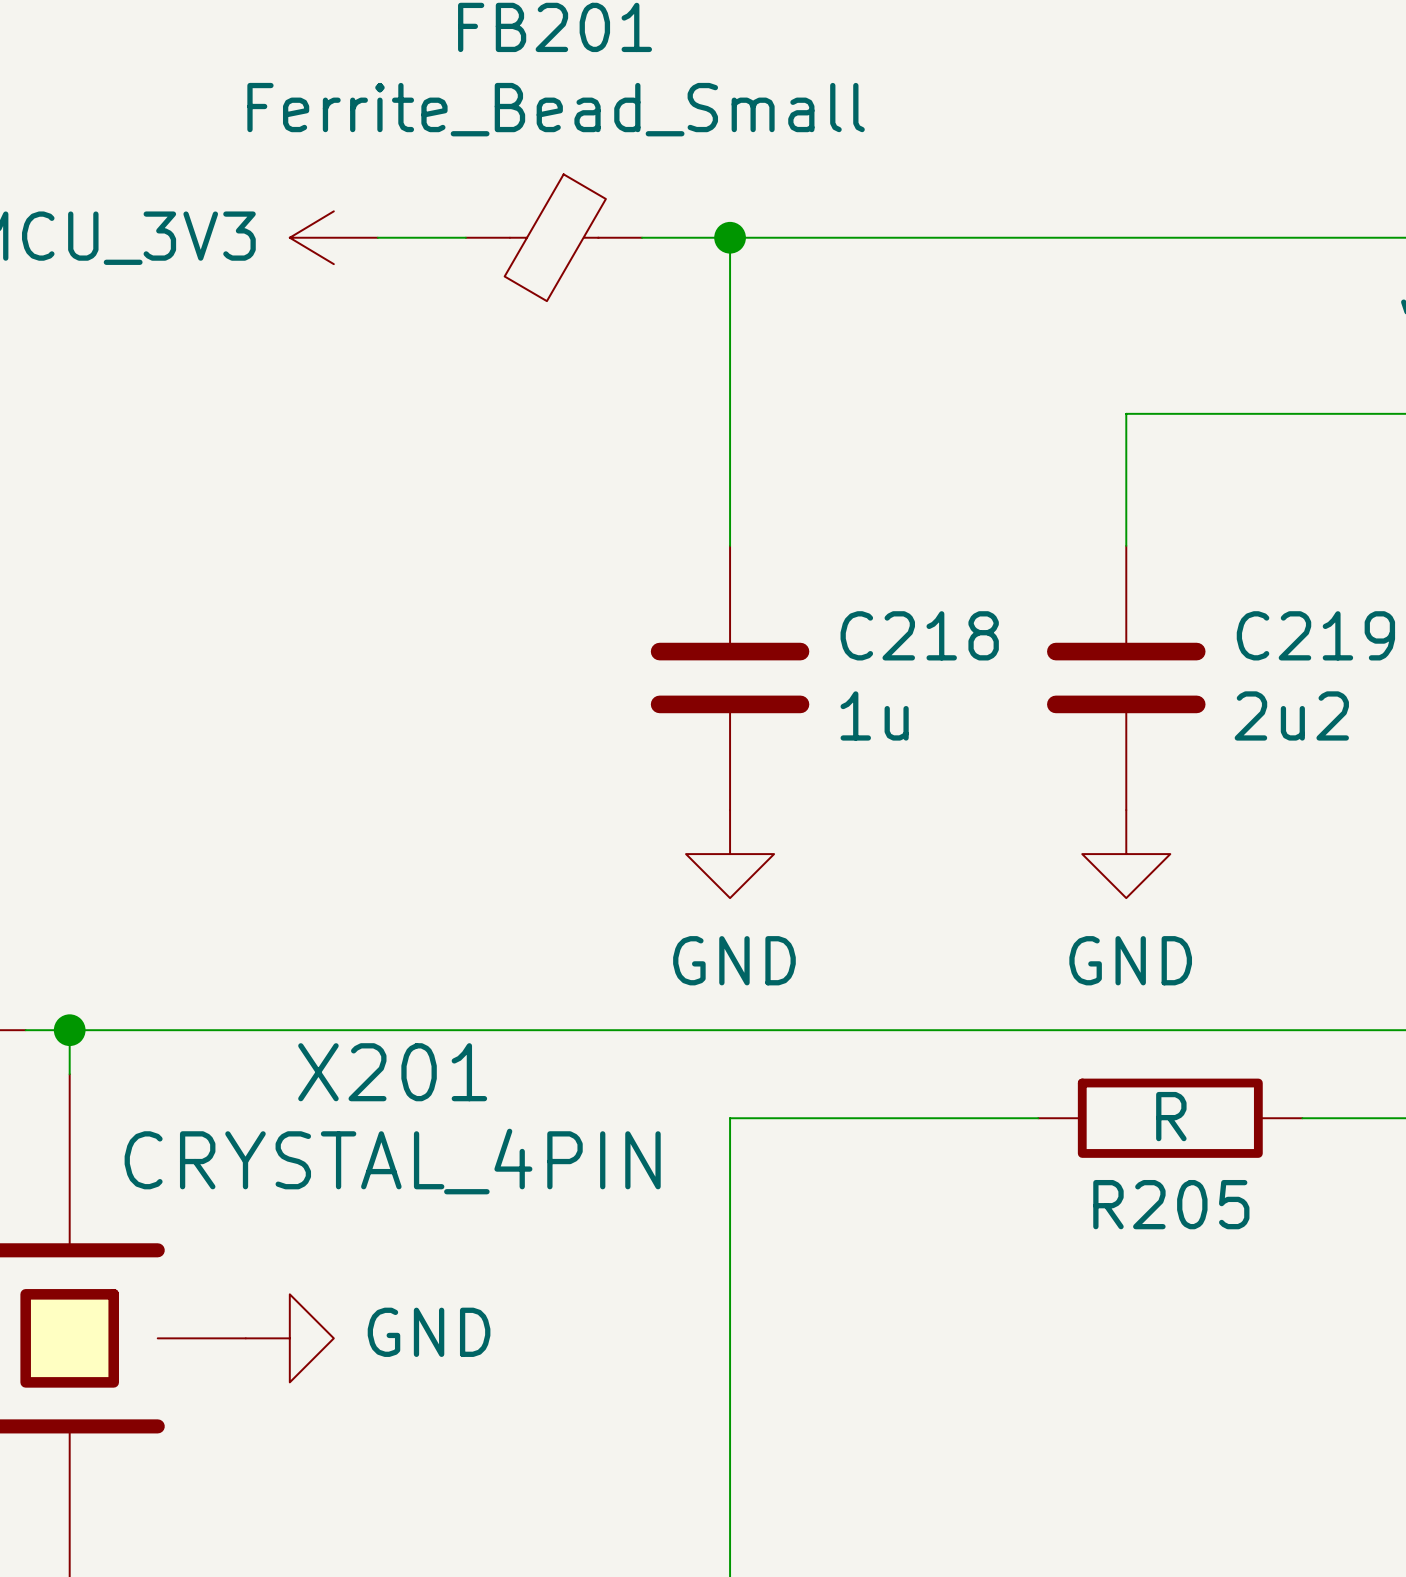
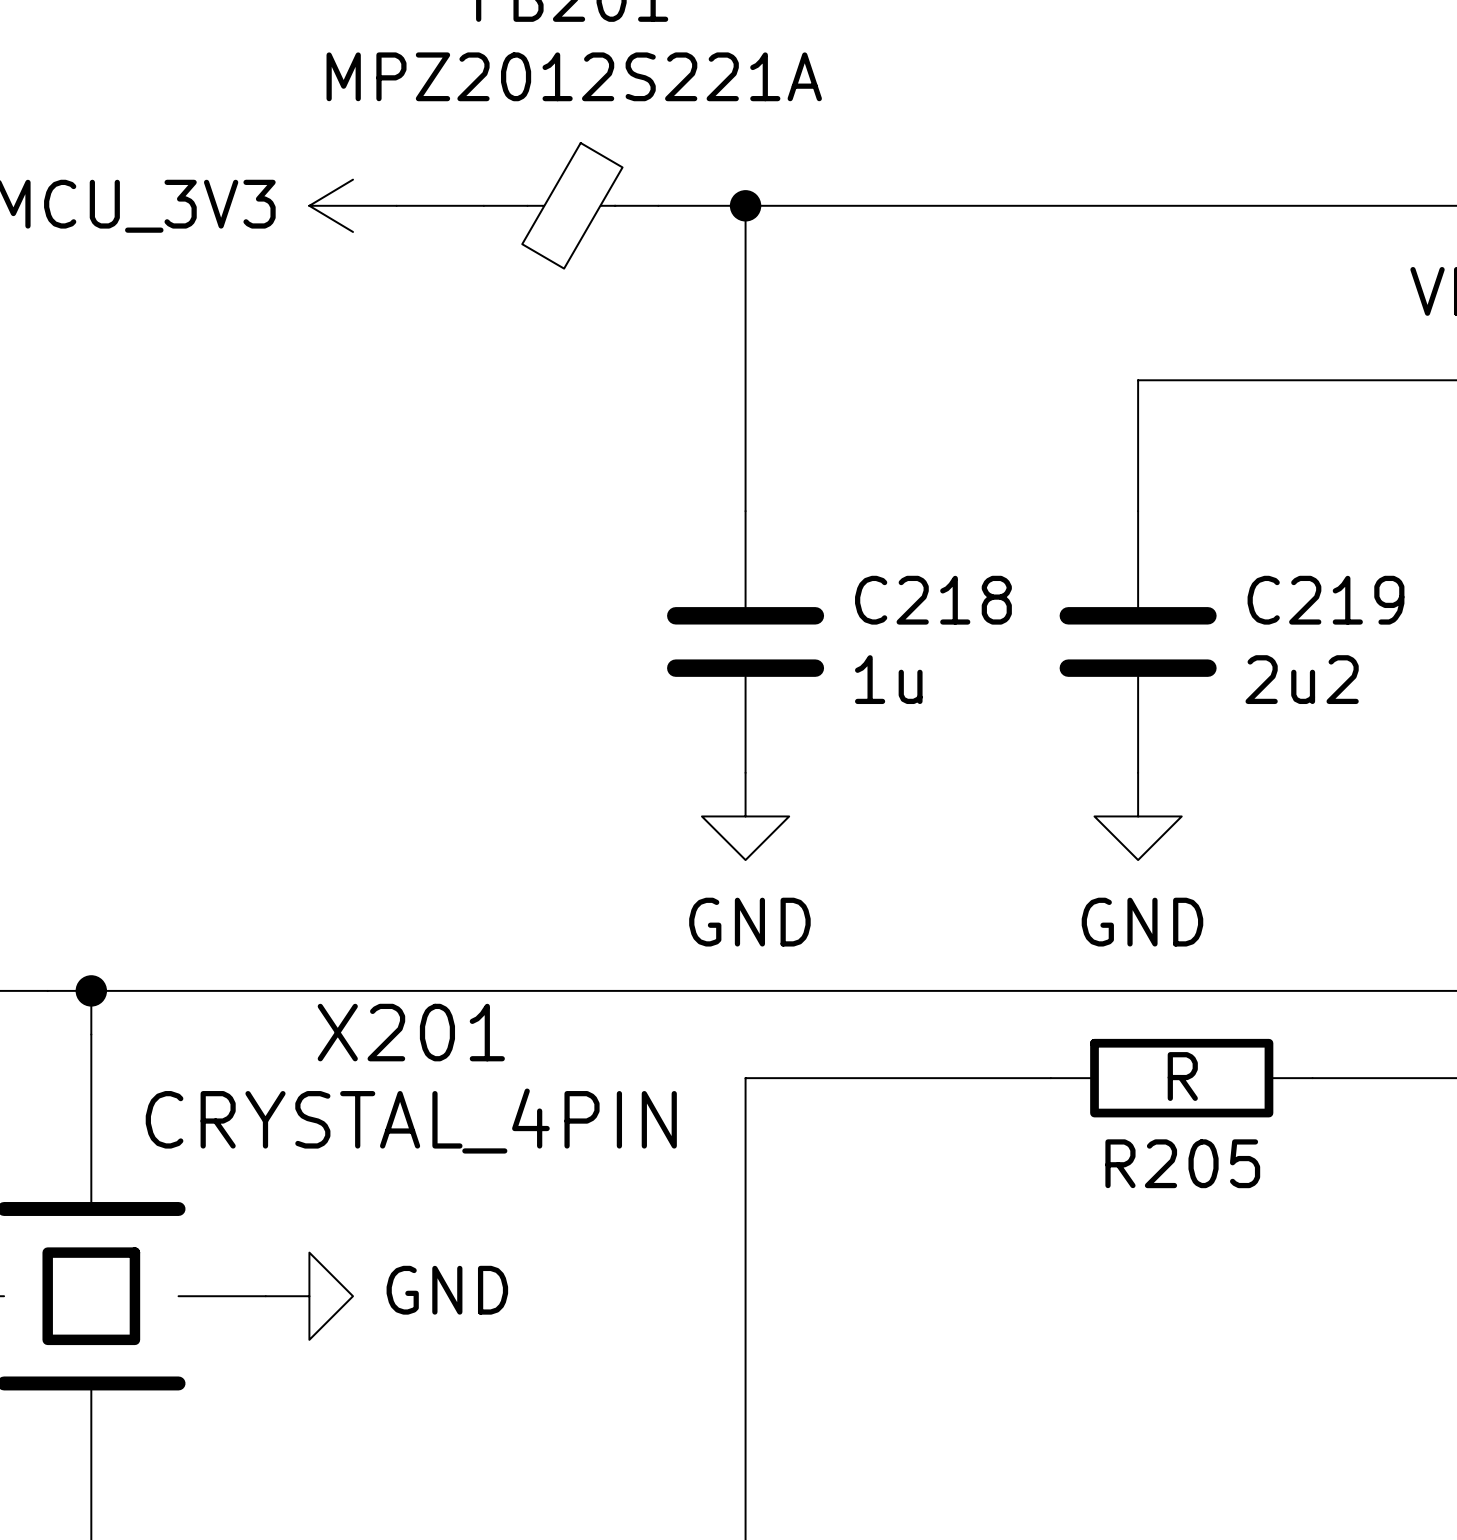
FB201 value: Ferrite_Bead_Small (556, 109) -> MPZ2012S221A (574, 76)

